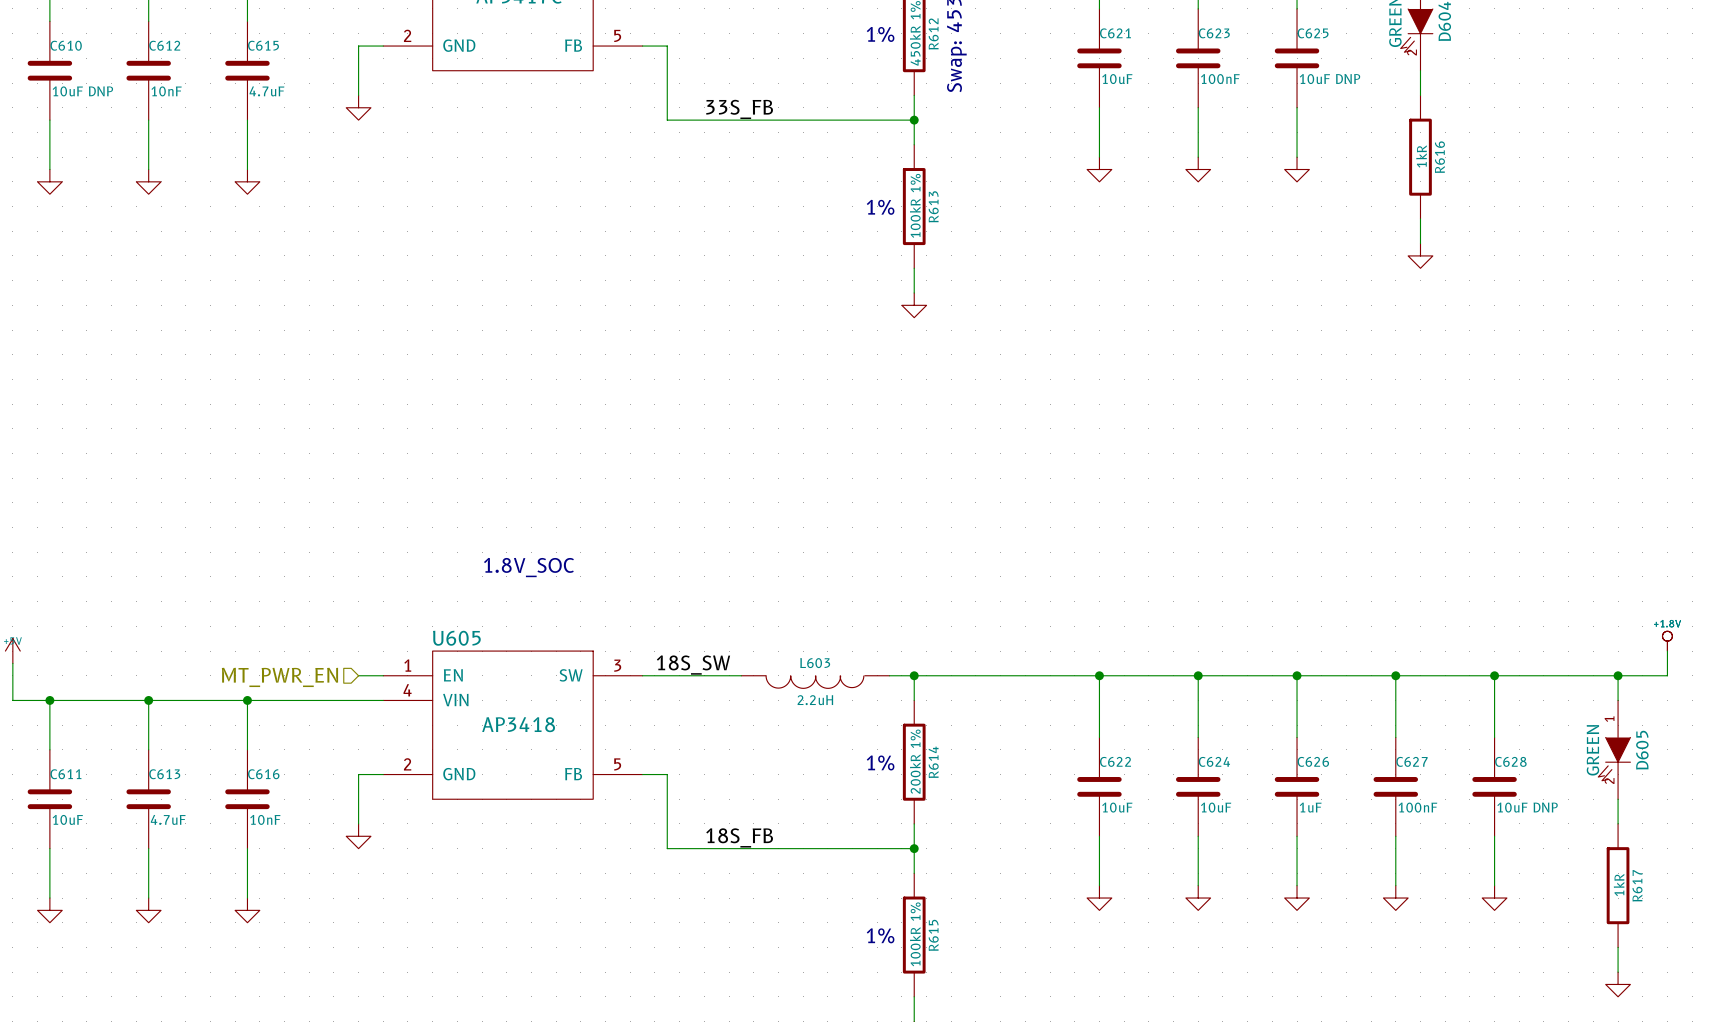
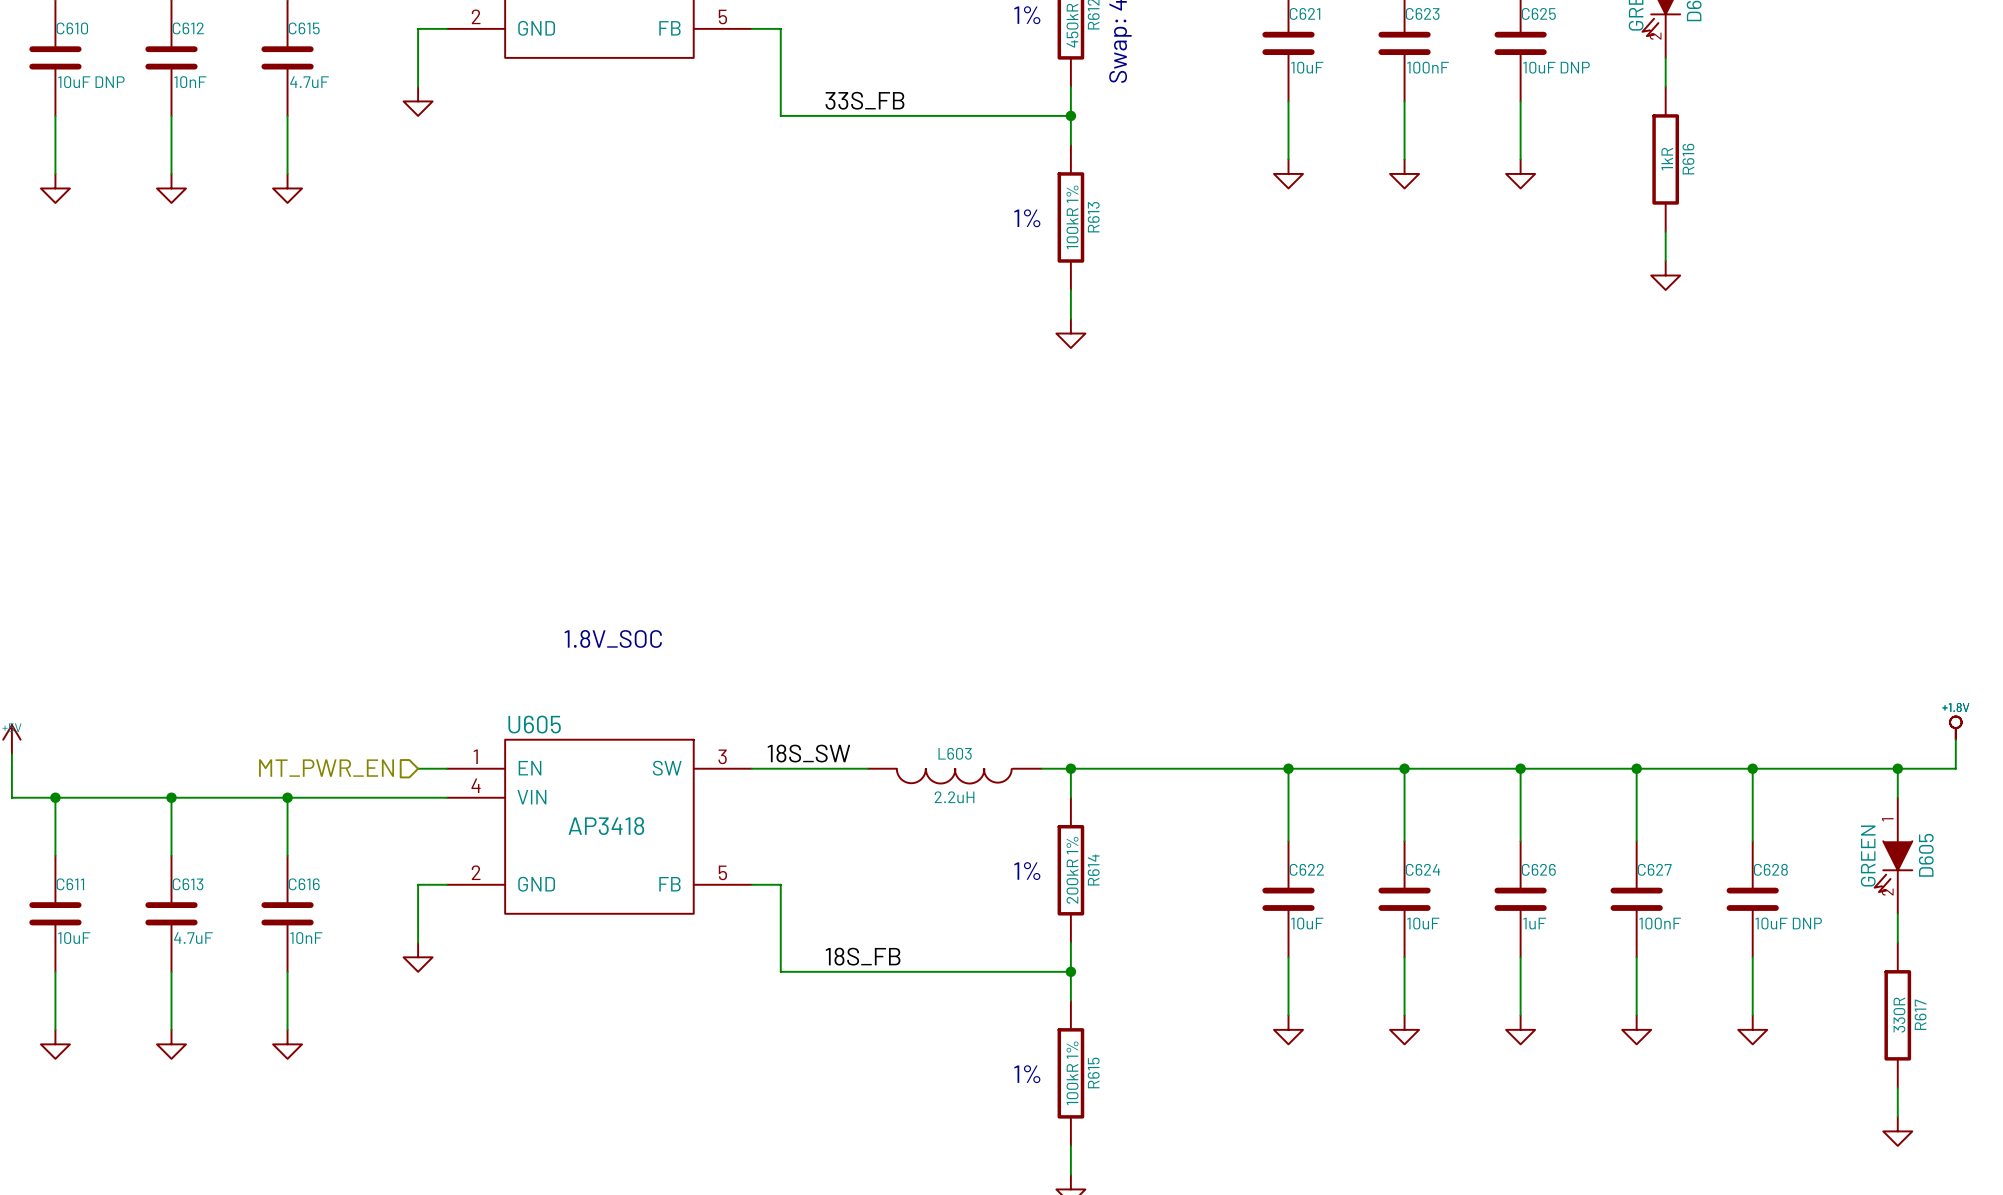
R617 value: 1kR (1619, 885) -> 330R (1899, 1015)

